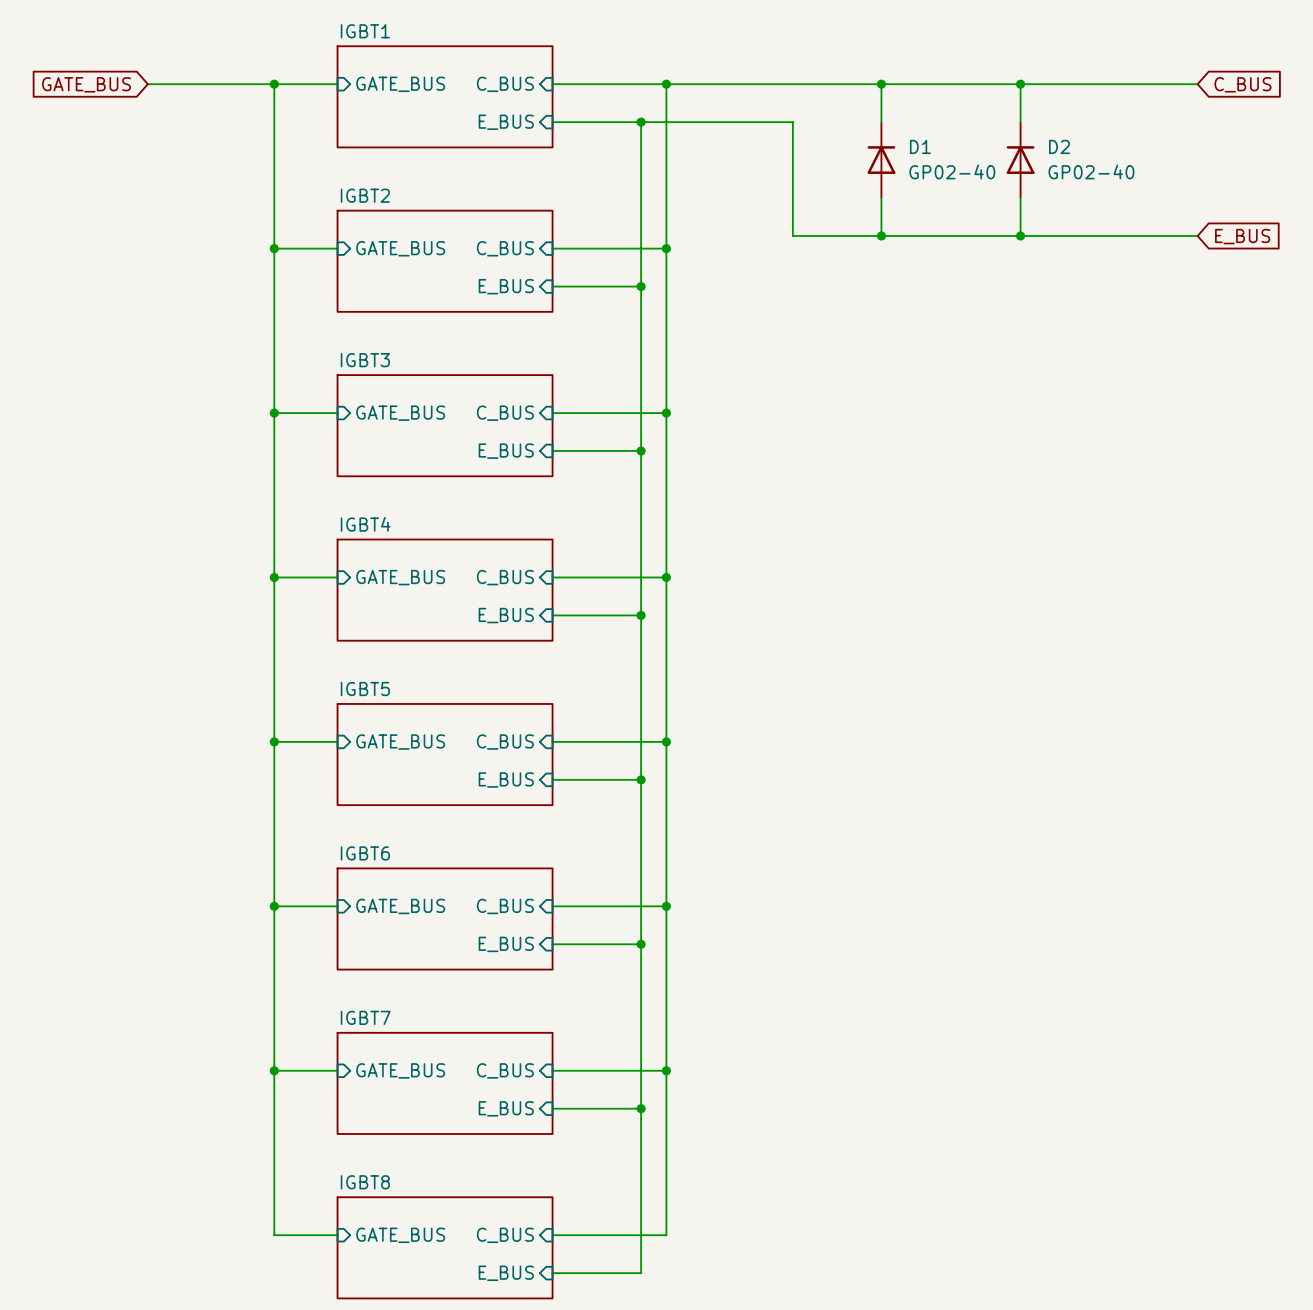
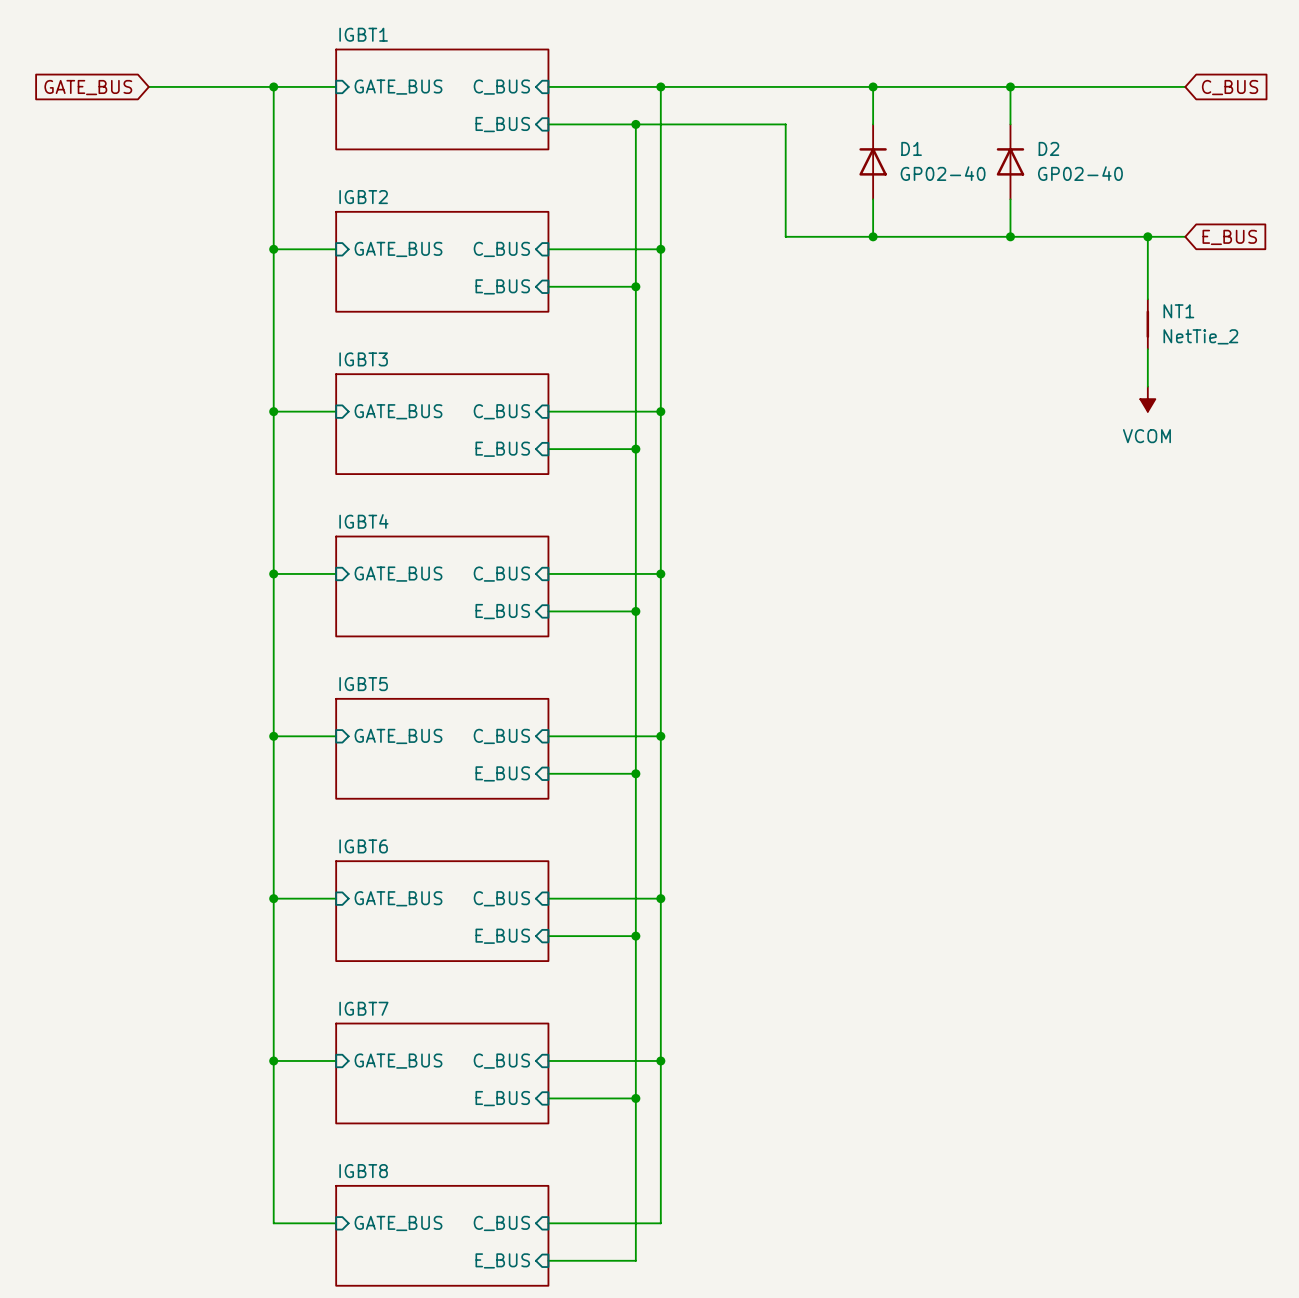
wire: none -> (1147, 236) (1147, 299)
junction: none -> (1147, 236)
NT1: none -> NetTie_2 (1147, 324)
wire: none -> (1147, 349) (1147, 386)
power symbol: none -> VCOM (1147, 399)

